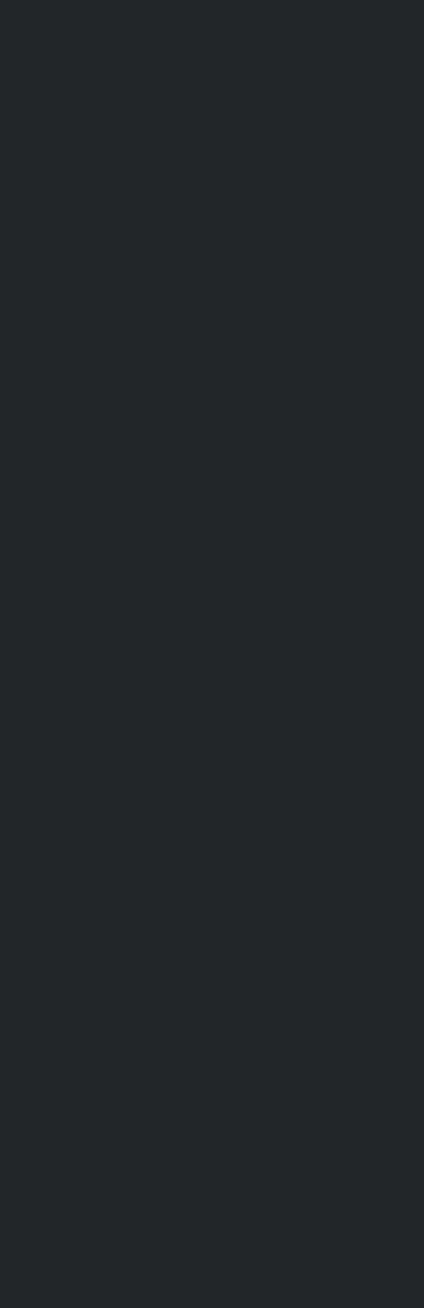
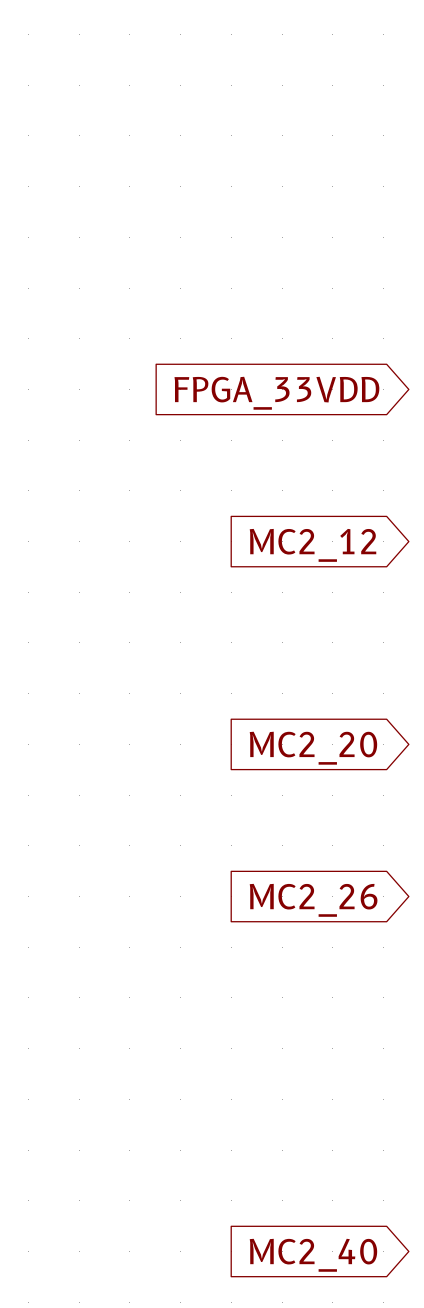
global label: none -> FPGA_33VDD (276, 393)
global label: none -> MC2_12 (313, 545)
global label: none -> MC2_20 (313, 748)
global label: none -> MC2_26 (313, 900)
global label: none -> MC2_40 (313, 1255)

